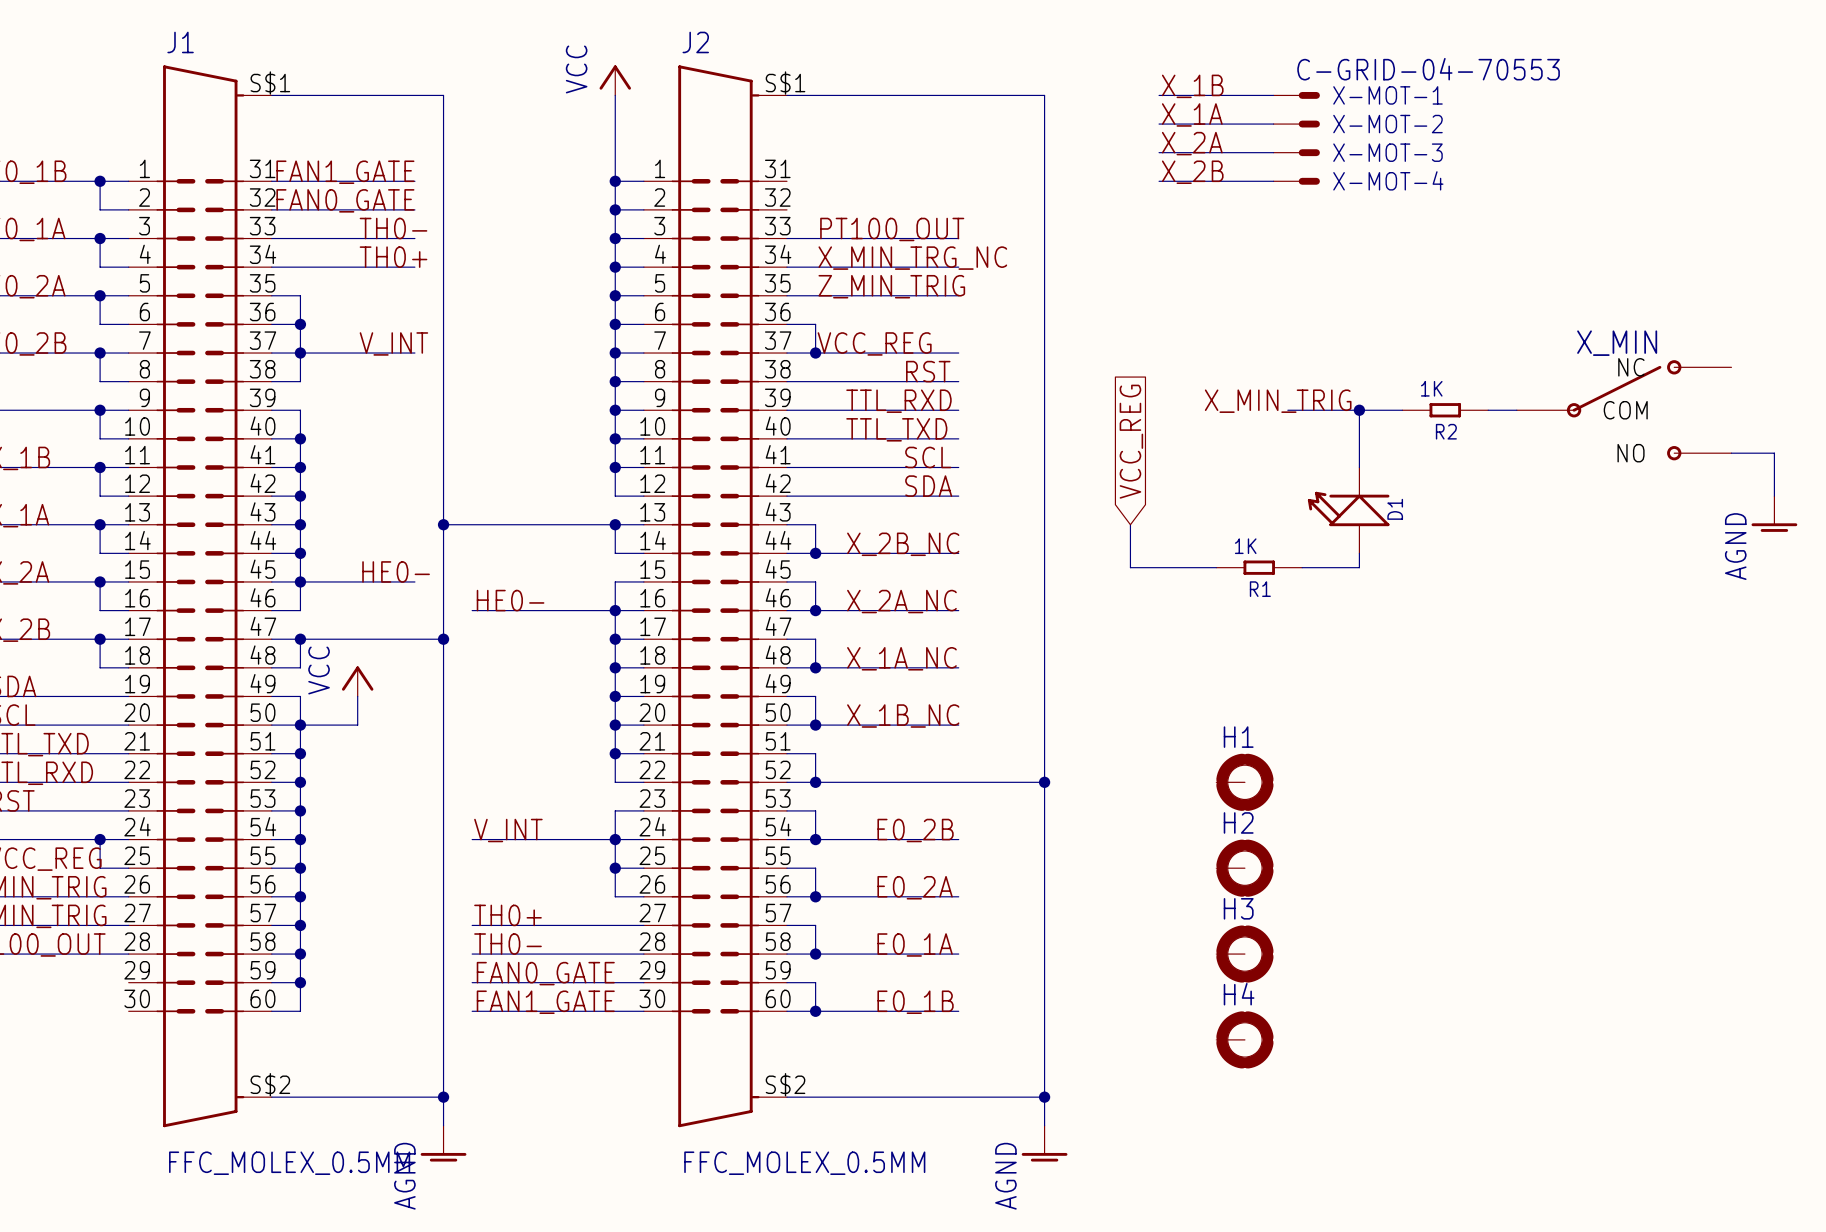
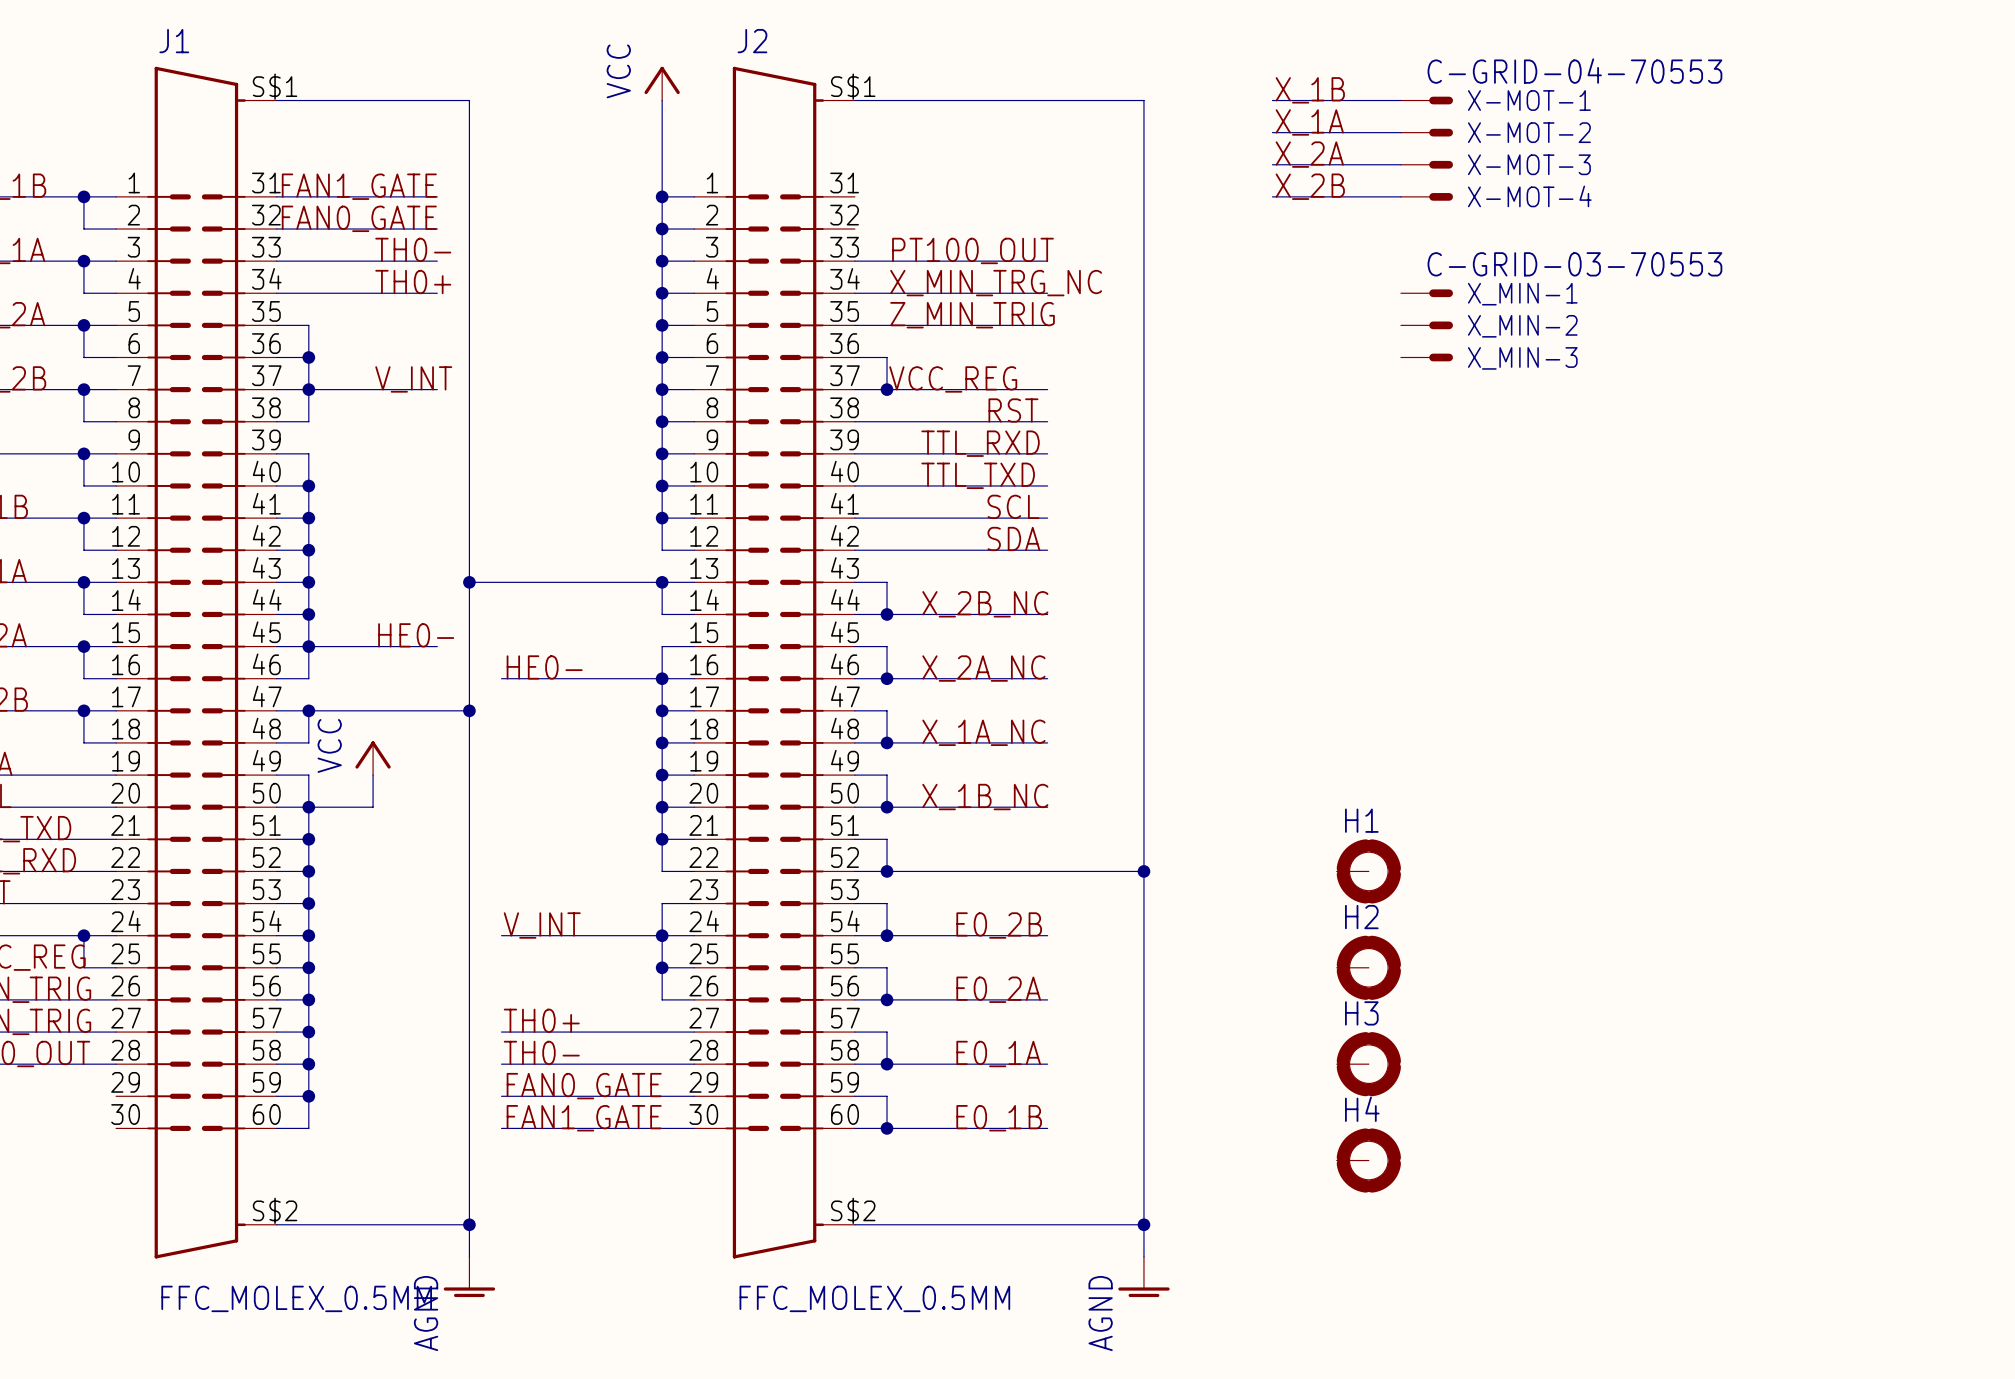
X_MIN-1: none -> C-GRID-03-70553 (1426, 293)
X_MIN-2: none -> (1426, 325)
X_MIN-3: none -> (1426, 357)
label: X_MIN_TRIG (1278, 401) -> none
wire: (1287, 410) (1402, 410) -> none
wire: (1359, 410) (1359, 467) -> none
junction: (1359, 410) -> none
R2: 1K (1445, 410) -> none
wire: (1488, 410) (1516, 410) -> none
X_MIN: (1624, 410) -> none
global label: VCC_REG (1131, 441) -> none
wire: (1731, 453) (1774, 453) (1774, 496) -> none
D1: (1348, 510) -> none
power symbol: AGND (1774, 514) -> none
wire: (1130, 524) (1130, 567) (1216, 567) -> none
wire: (1359, 553) (1359, 567) (1302, 567) -> none
R1: 1K (1259, 567) -> none

